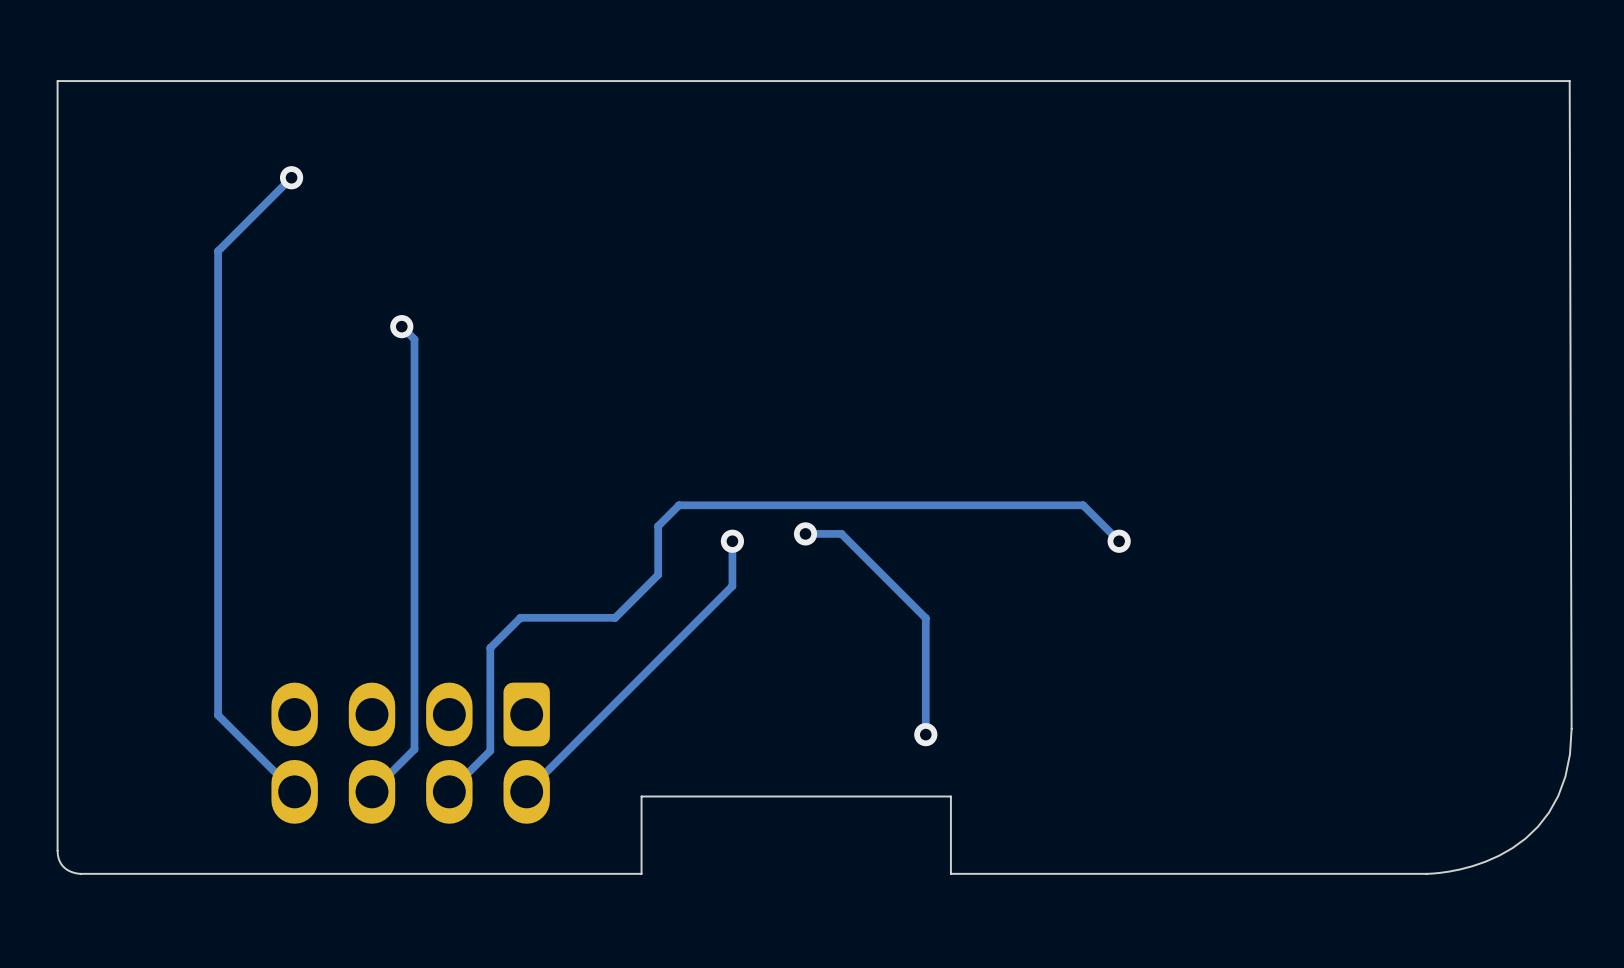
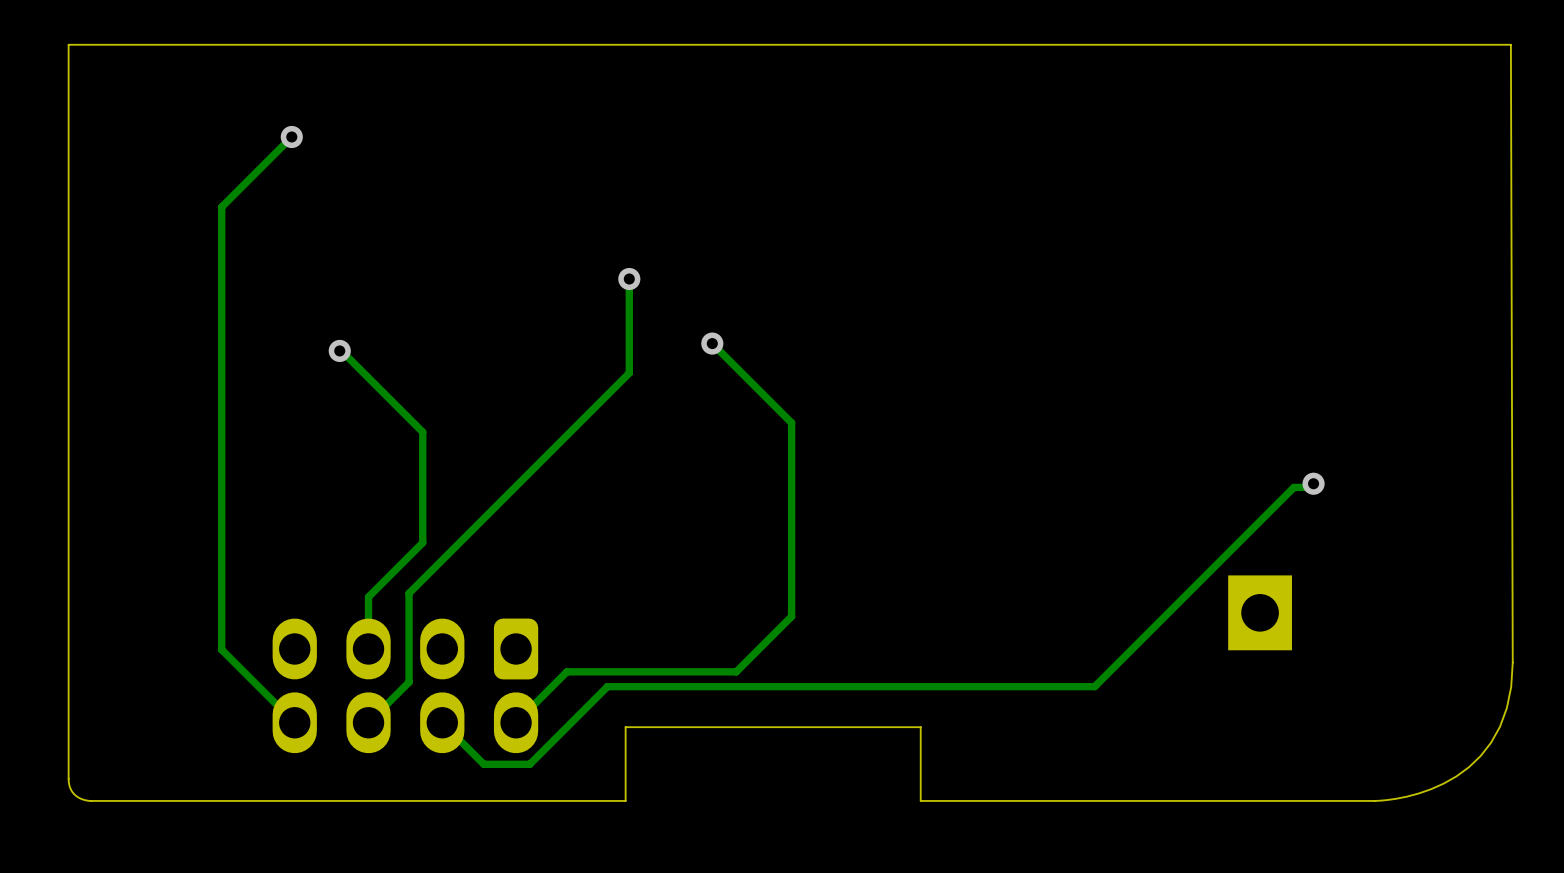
track: (401, 326) (414, 339) (414, 656) -> (629, 279) (629, 373) (409, 593)
via position: (401, 326) -> (339, 350)
via: none -> (629, 279)
via: none -> (712, 343)
track: none -> (339, 350) (422, 432) (422, 542) (368, 596) (368, 648)
track: (805, 533) (841, 533) (925, 618) (925, 734) -> none
via: (805, 533) -> none
via: (732, 541) -> none
track: (1119, 541) (1083, 505) (679, 505) (658, 526) (658, 574) (615, 617) (520, 617) (490, 647) (490, 750) (449, 791) -> (1313, 483) (1309, 487) (1293, 487) (1094, 686) (607, 686) (529, 764) (483, 764) (442, 722)
via: (1119, 541) -> none
via: none -> (1313, 483)
track: (734, 543) (732, 541) (732, 586) (580, 738) -> (712, 343) (791, 422) (791, 616) (736, 671) (566, 671)
part: none -> (1260, 612)
via: (925, 734) -> none

